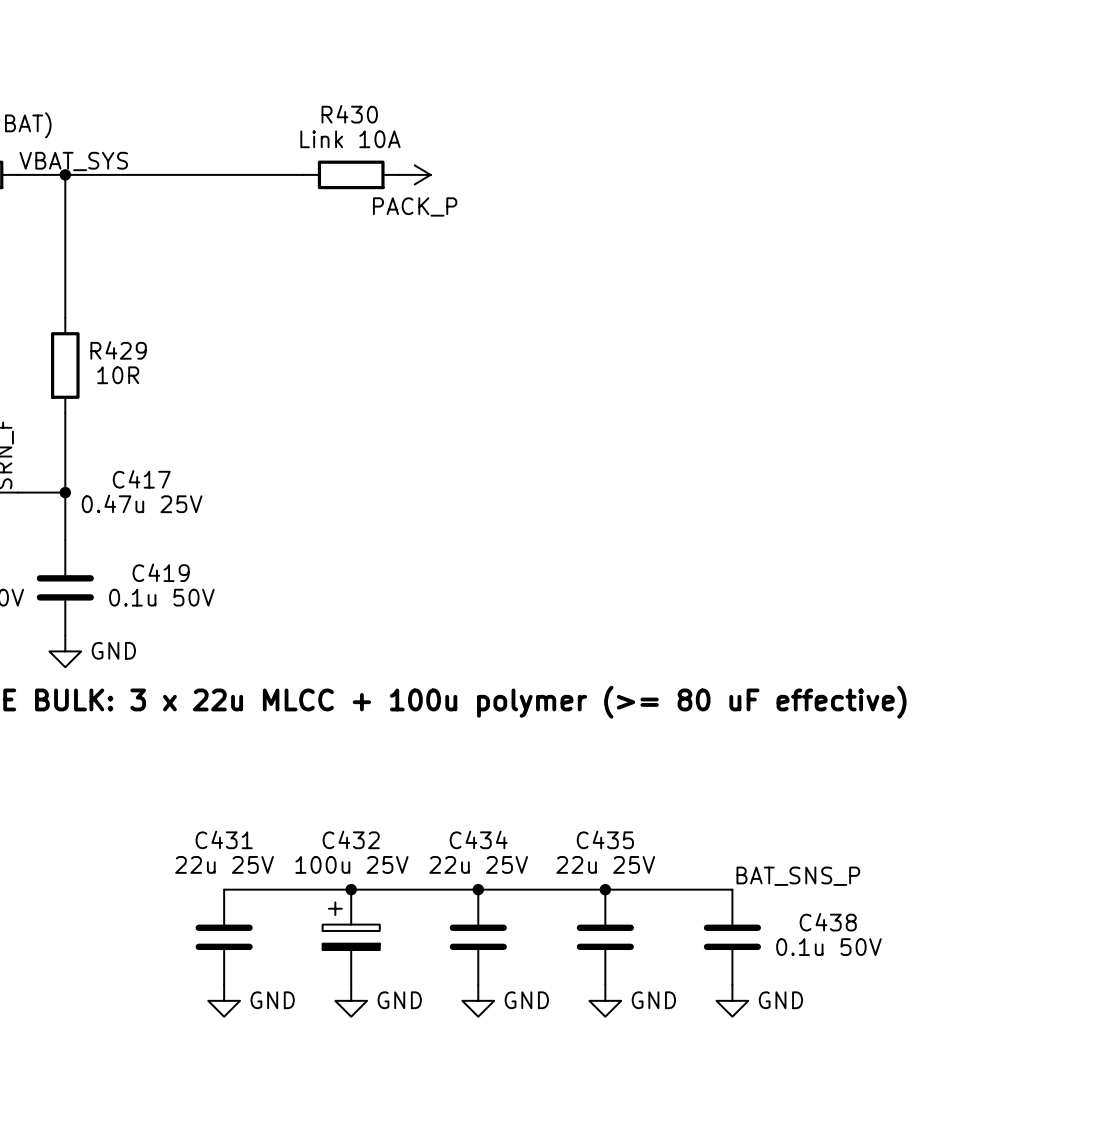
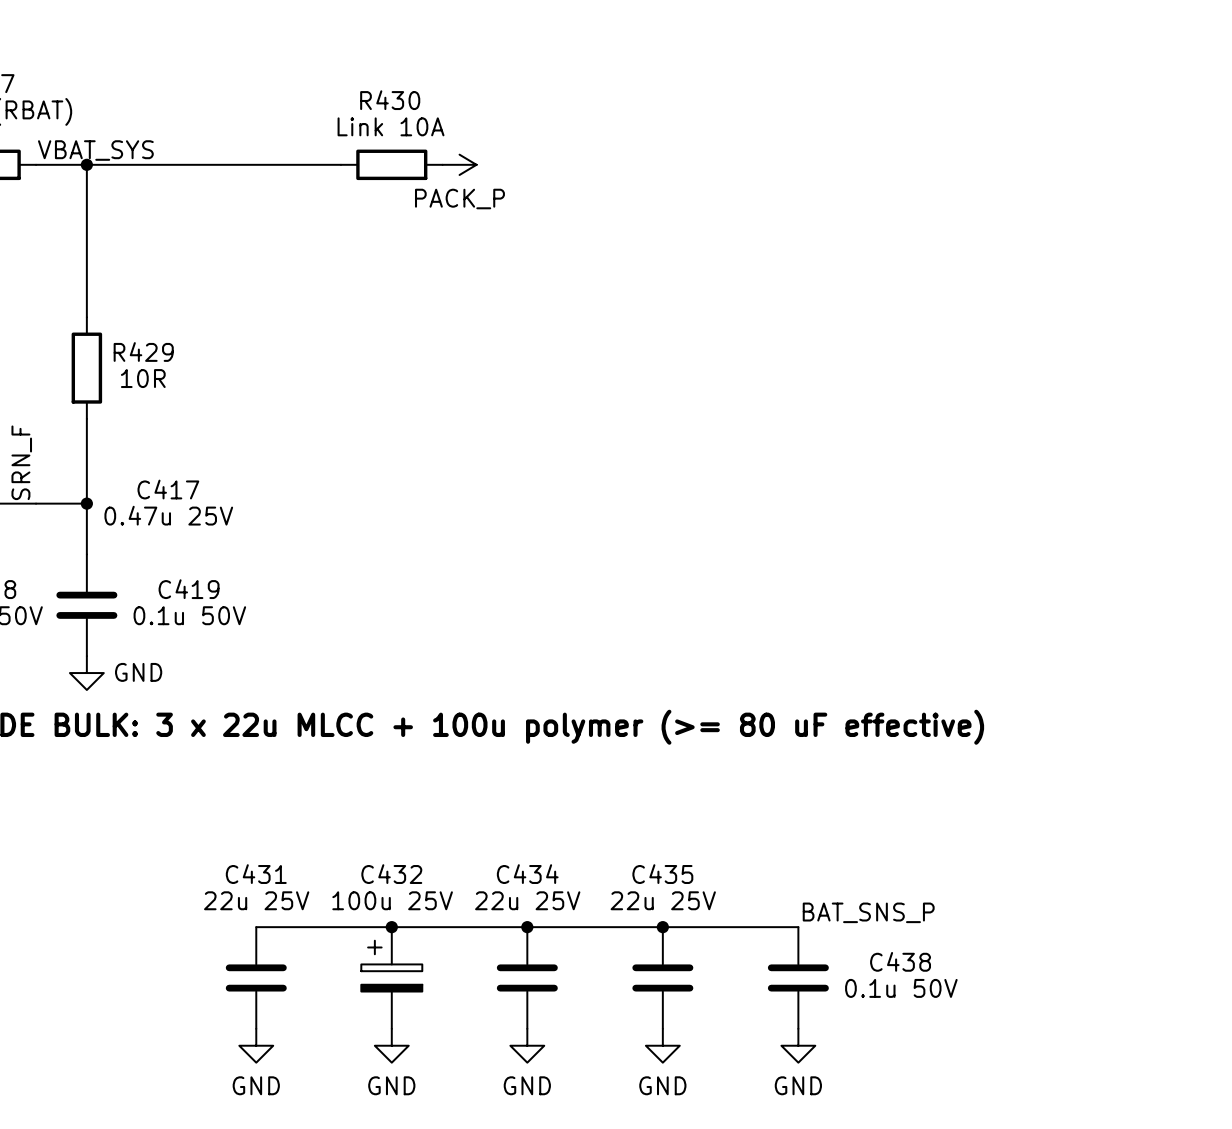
power symbol text position: GND (272, 1000) -> GND (256, 1085)
power symbol text position: GND (399, 1000) -> GND (391, 1085)
power symbol text position: GND (526, 1000) -> GND (527, 1085)
power symbol text position: GND (653, 1000) -> GND (662, 1085)
power symbol text position: GND (780, 1000) -> GND (798, 1085)

